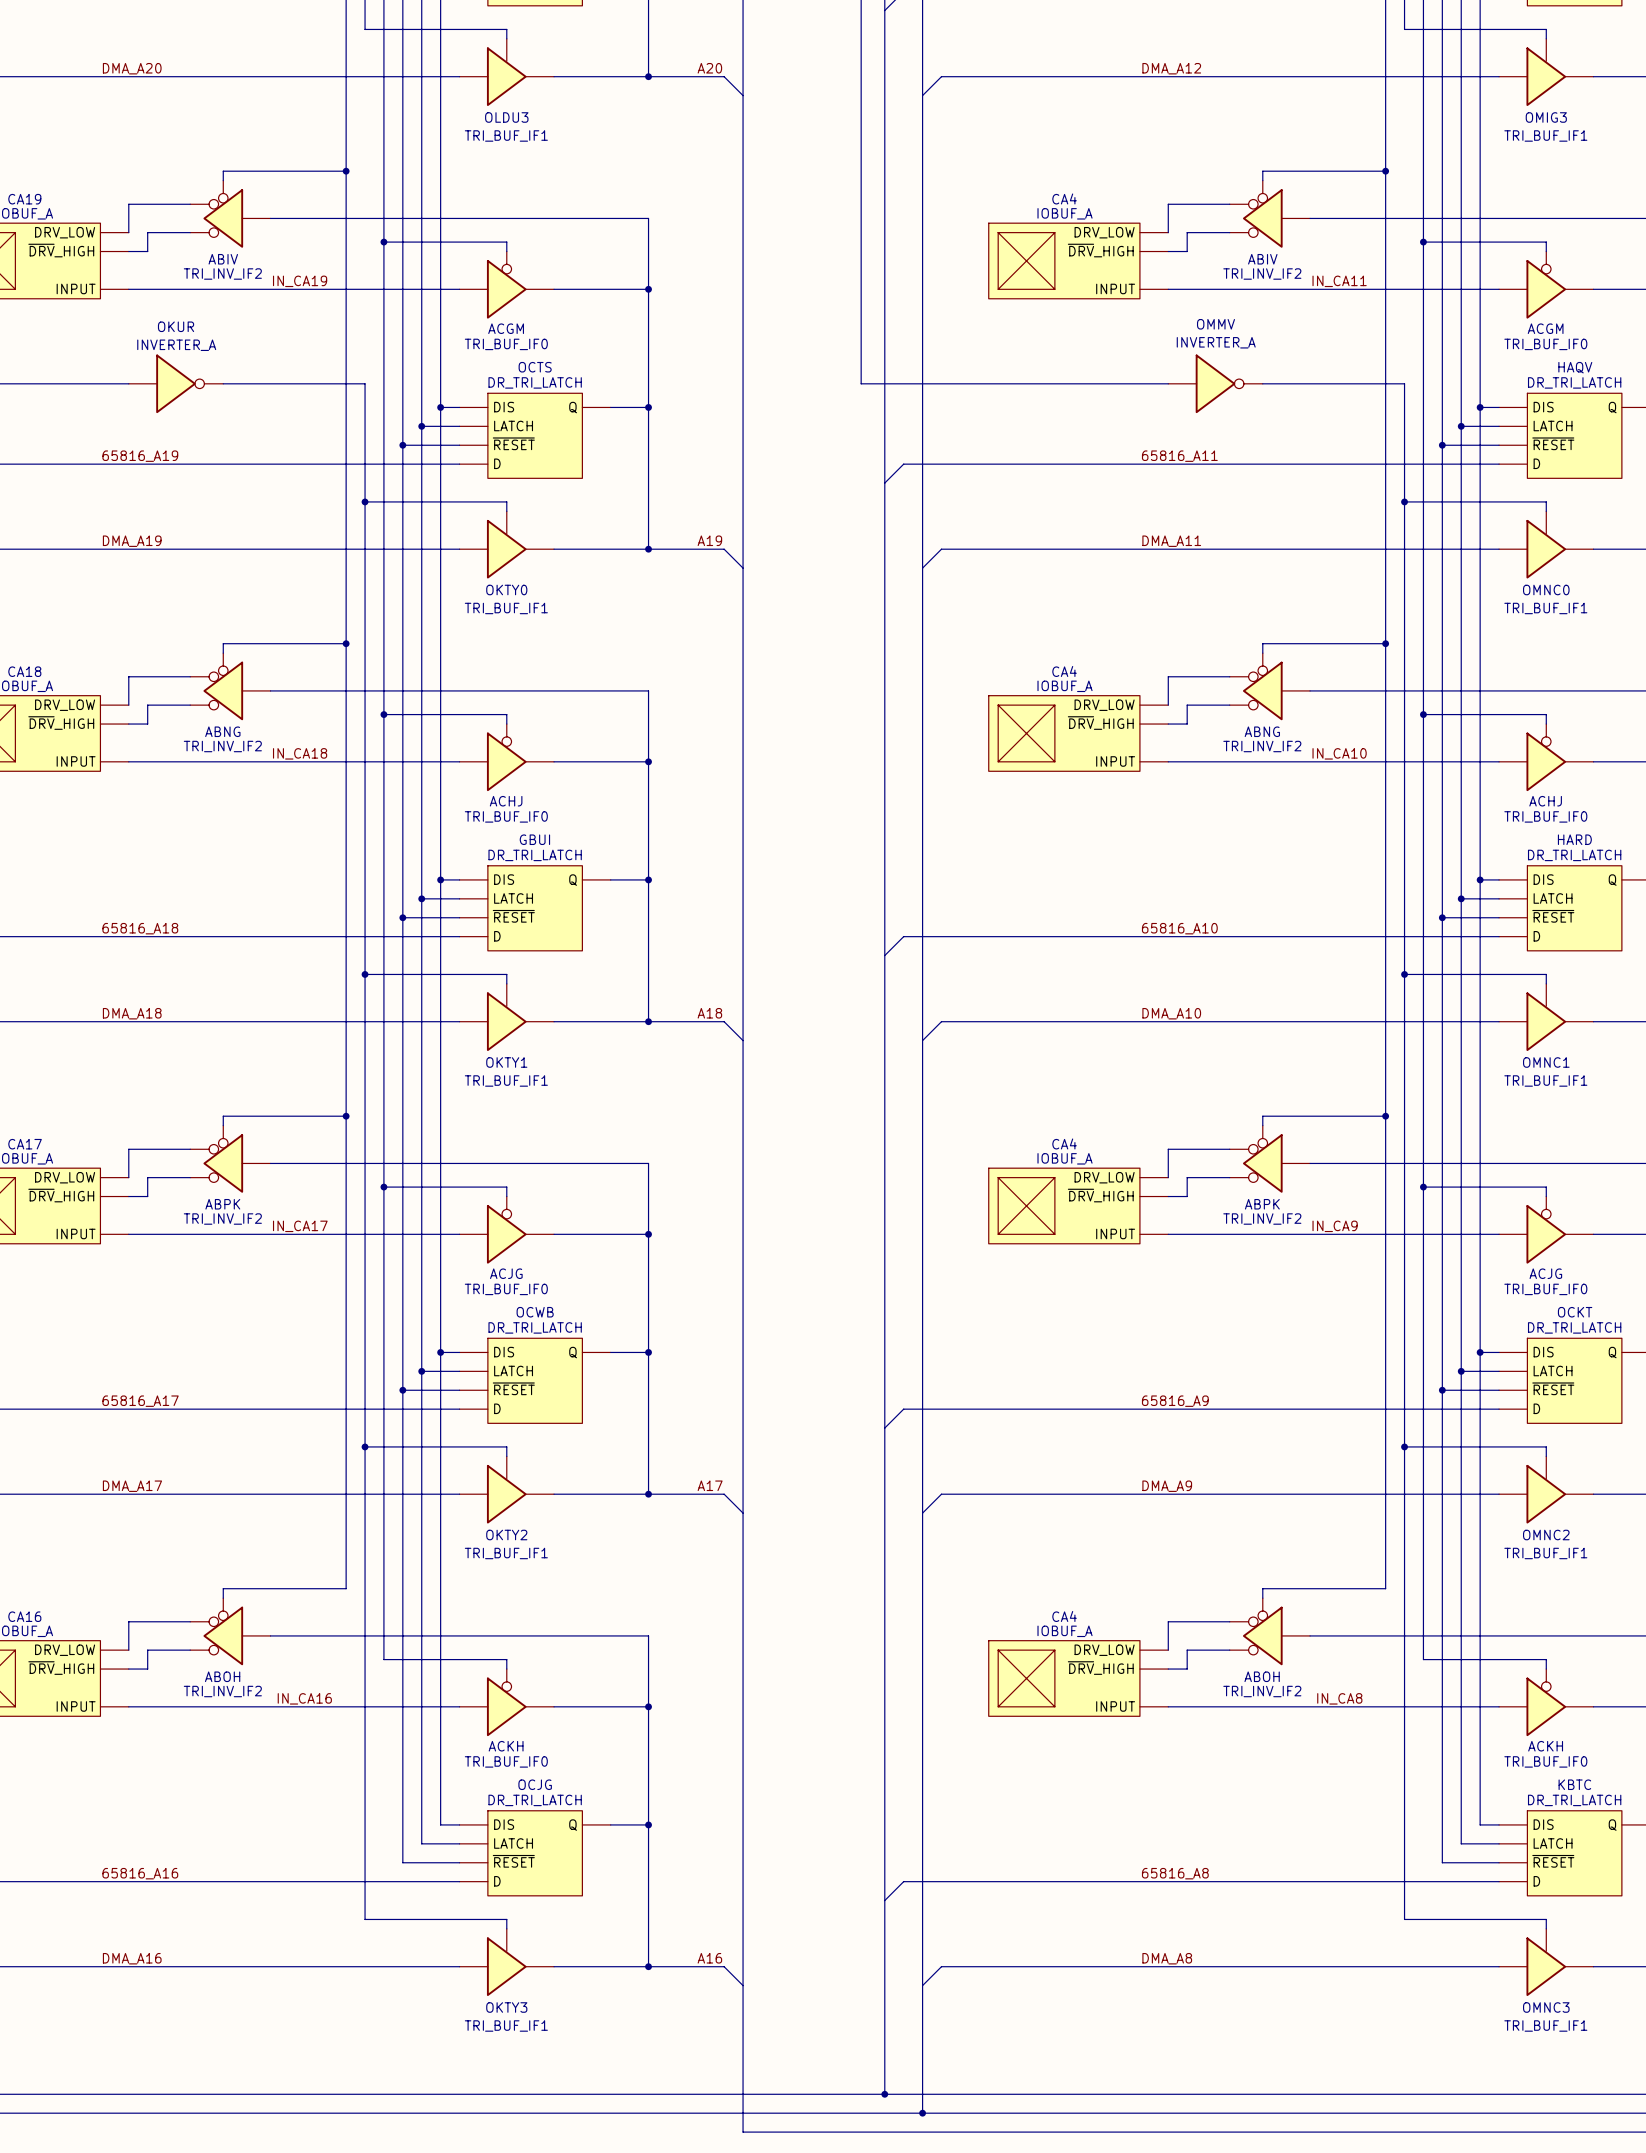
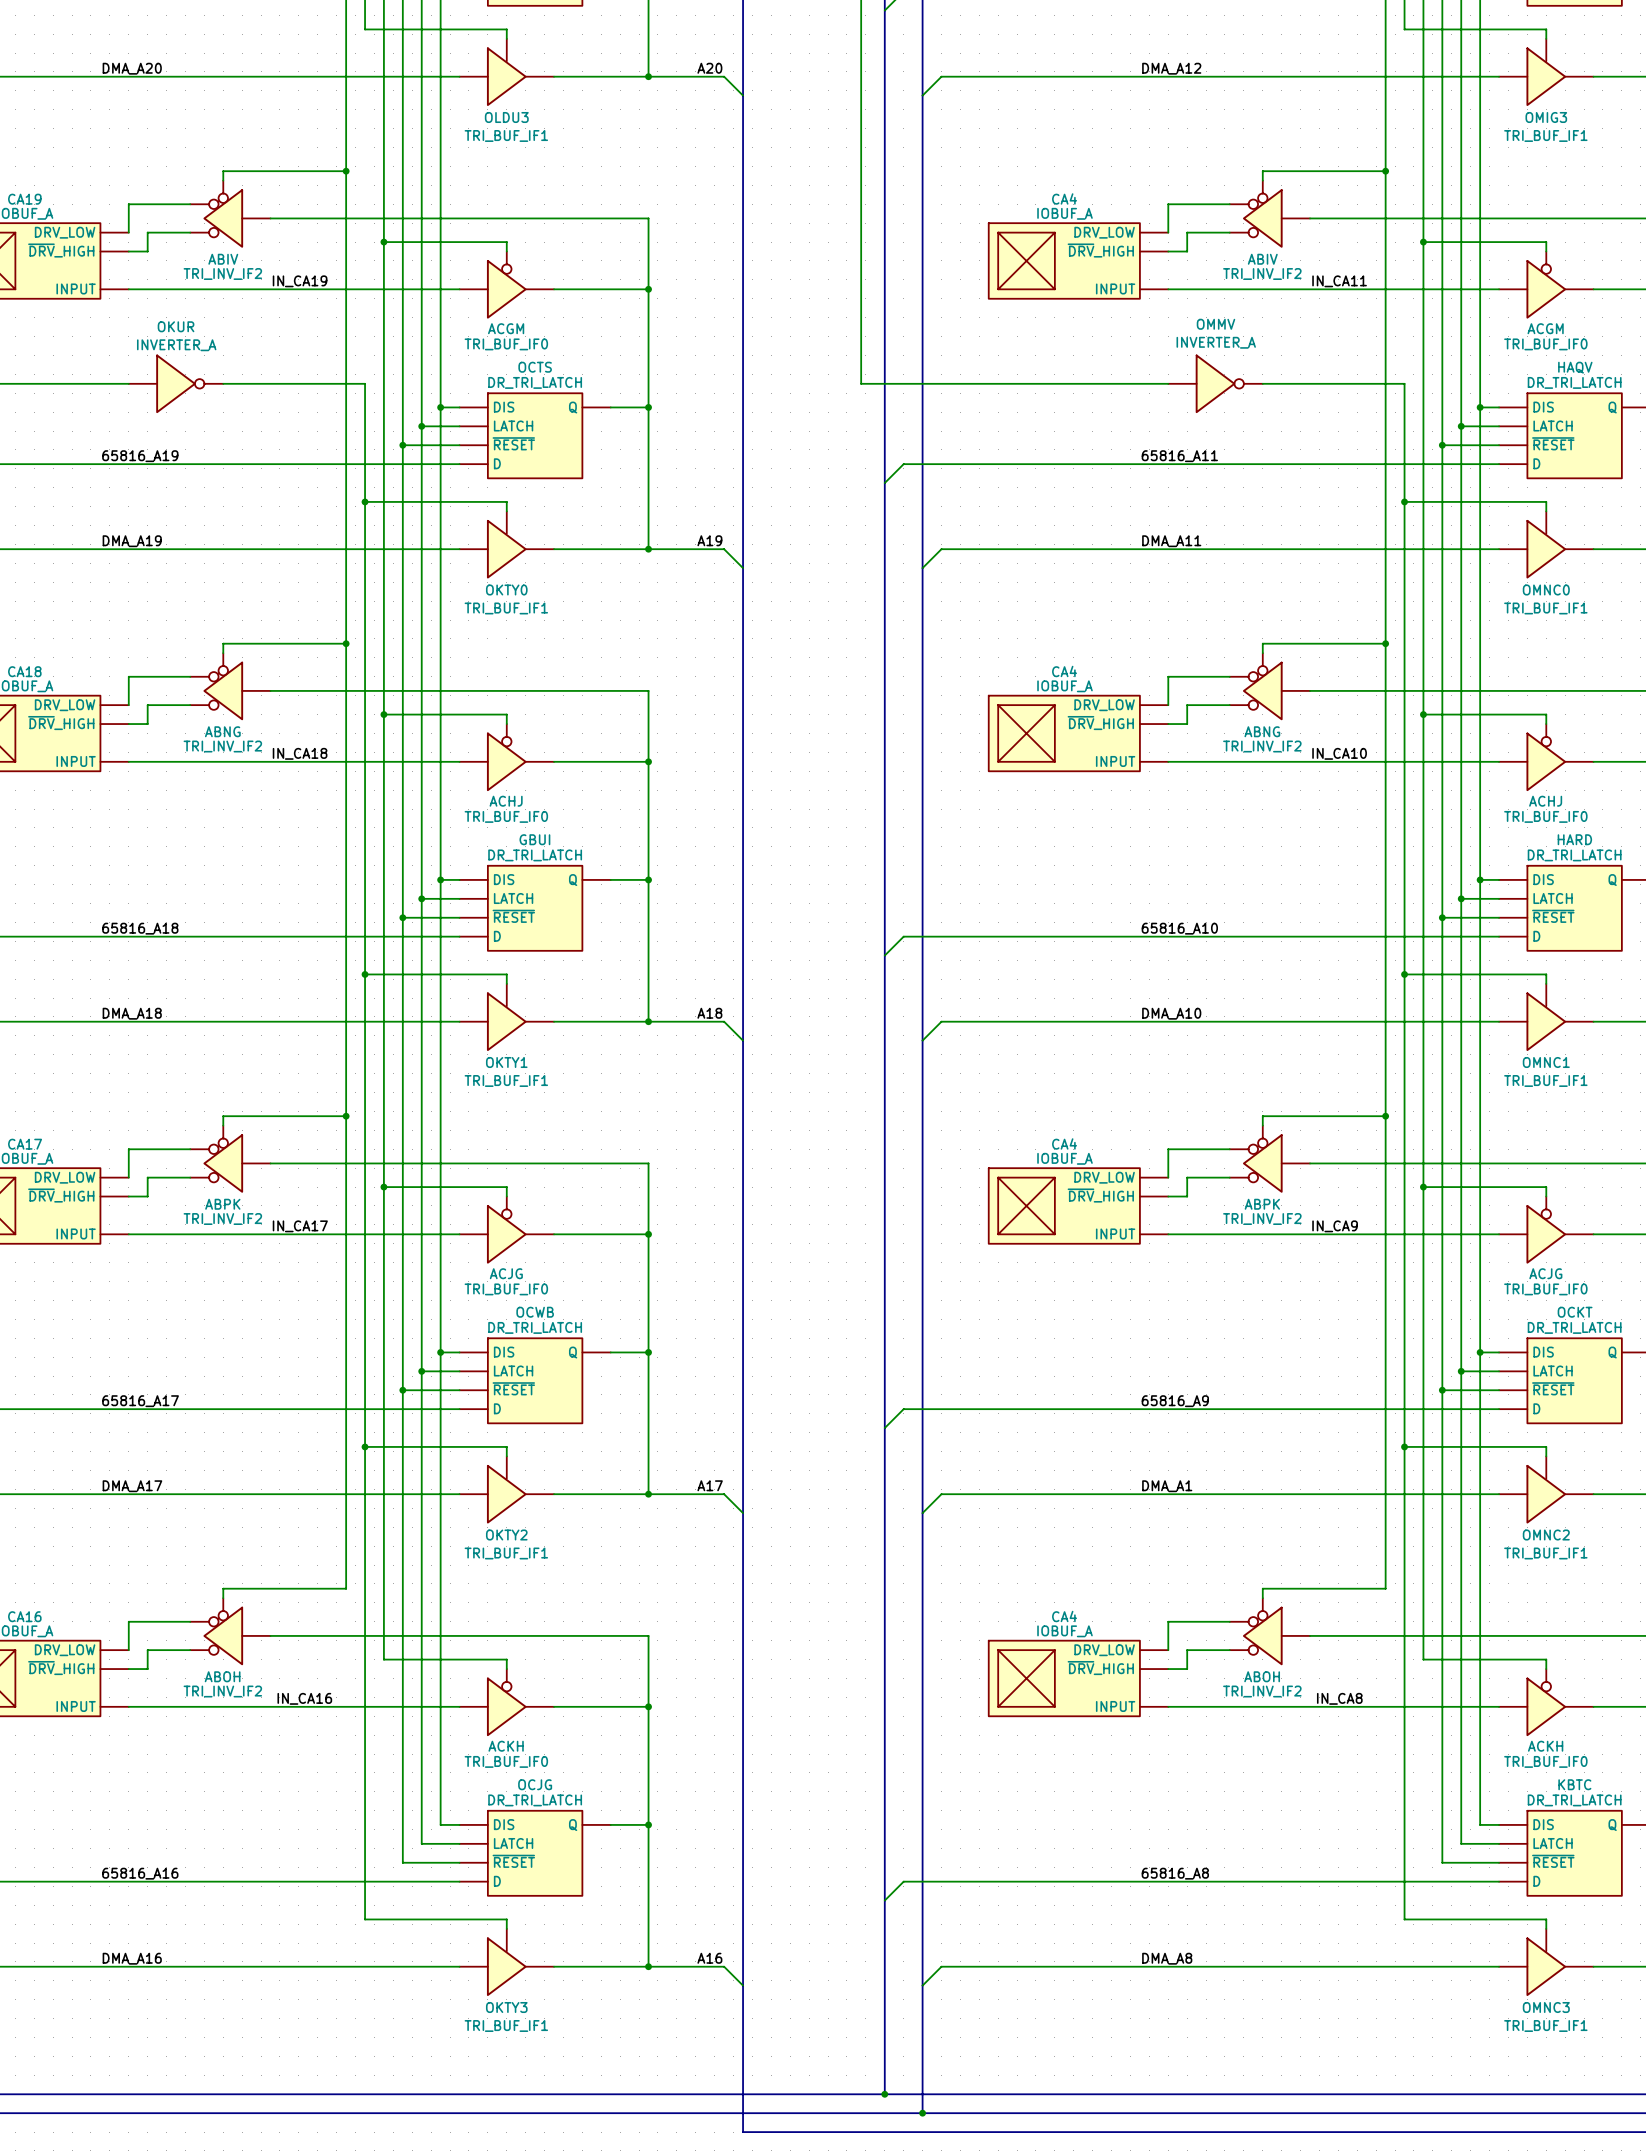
label: DMA_A9 (1167, 1486) -> DMA_A1 (1167, 1486)

